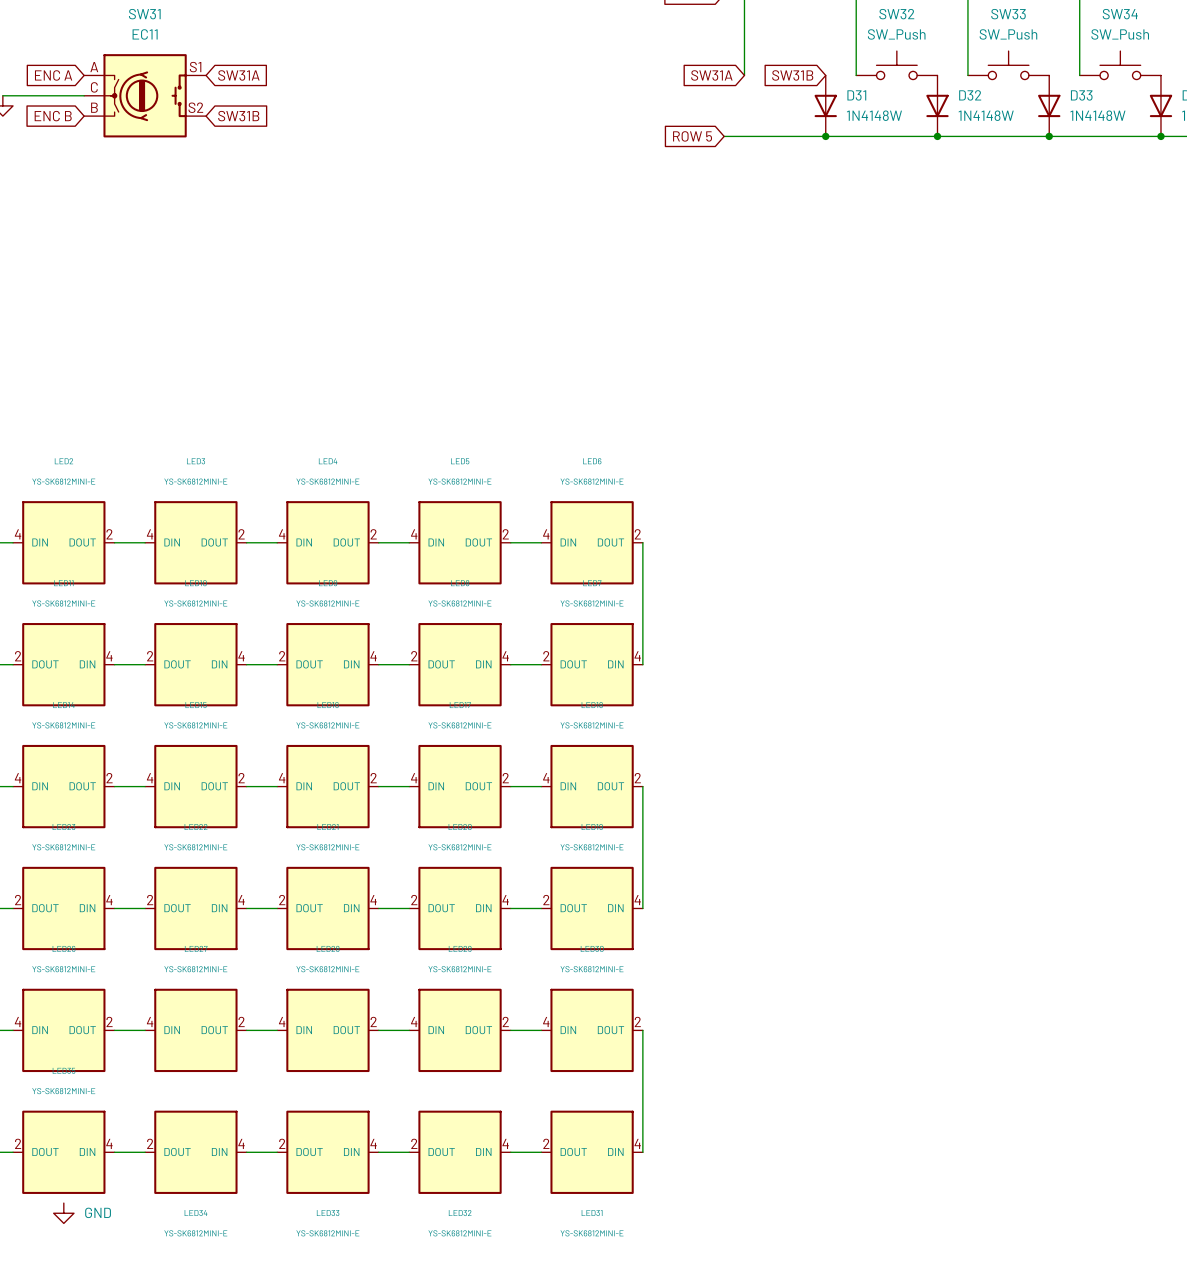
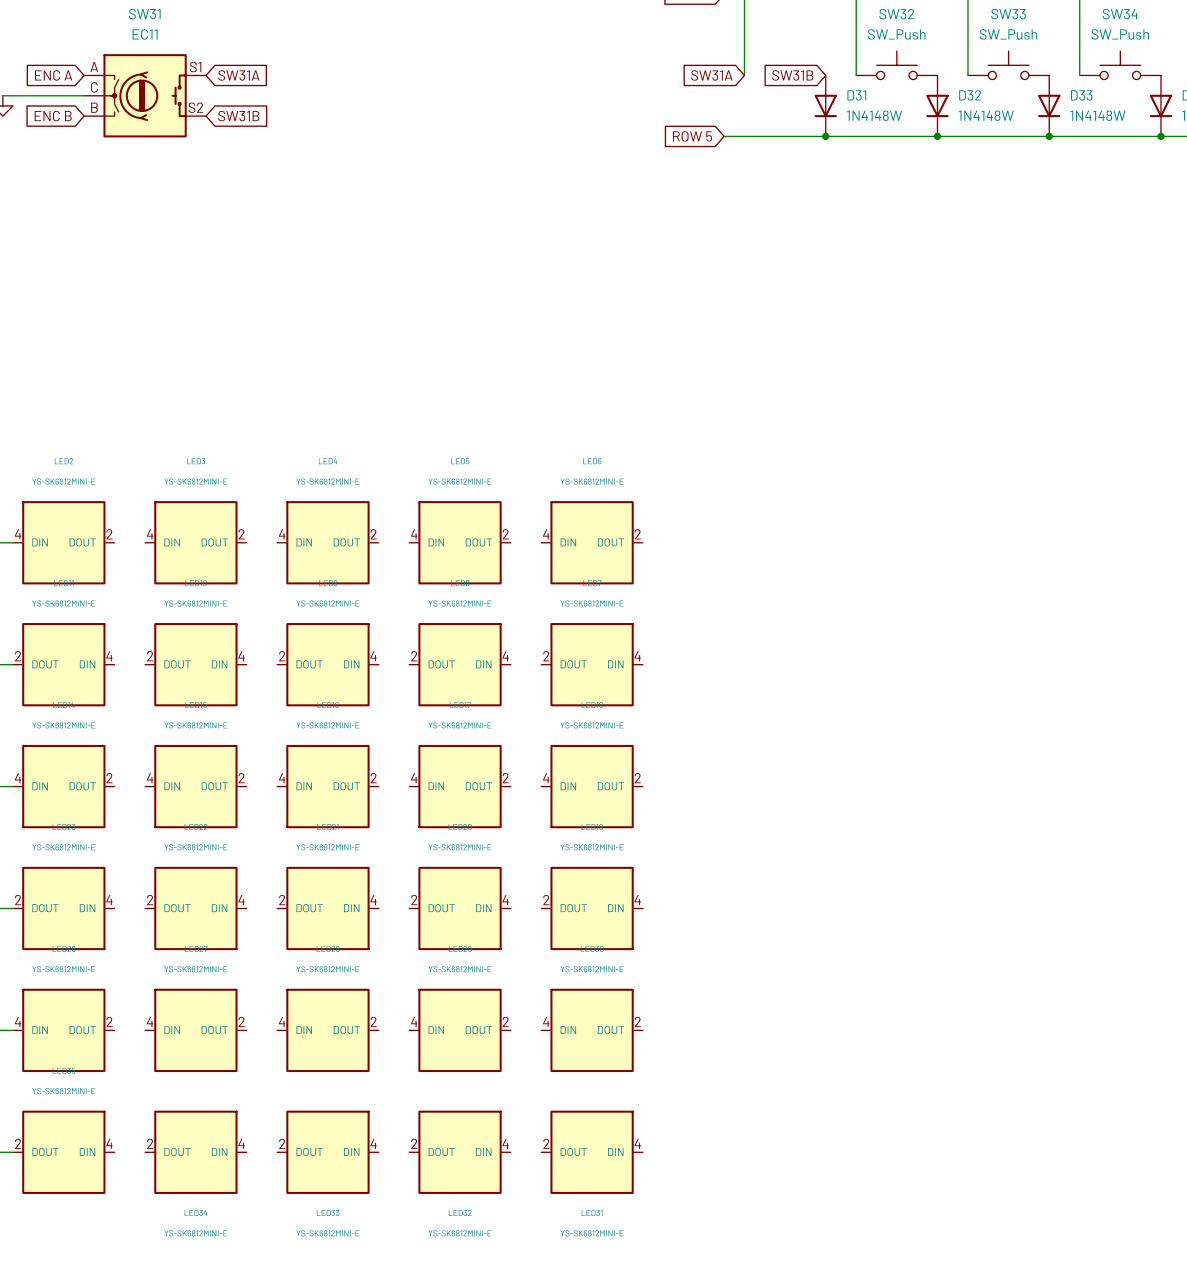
wire: (114, 542) (145, 542) -> none
wire: (246, 542) (277, 542) -> none
wire: (378, 542) (409, 542) -> none
wire: (510, 542) (541, 542) -> none
wire: (642, 542) (642, 664) -> none
wire: (114, 664) (145, 664) -> none
wire: (246, 664) (277, 664) -> none
wire: (378, 664) (409, 664) -> none
wire: (510, 664) (541, 664) -> none
wire: (114, 786) (145, 786) -> none
wire: (246, 786) (277, 786) -> none
wire: (378, 786) (409, 786) -> none
wire: (510, 786) (541, 786) -> none
wire: (642, 786) (642, 908) -> none
wire: (114, 908) (145, 908) -> none
wire: (246, 908) (277, 908) -> none
wire: (378, 908) (409, 908) -> none
wire: (510, 908) (541, 908) -> none
wire: (114, 1030) (145, 1030) -> none
wire: (246, 1030) (277, 1030) -> none
wire: (378, 1030) (409, 1030) -> none
wire: (510, 1030) (541, 1030) -> none
wire: (642, 1030) (642, 1152) -> none
wire: (114, 1152) (145, 1152) -> none
wire: (246, 1152) (277, 1152) -> none
wire: (378, 1152) (409, 1152) -> none
wire: (510, 1152) (541, 1152) -> none
power symbol: GND (63, 1213) -> none

